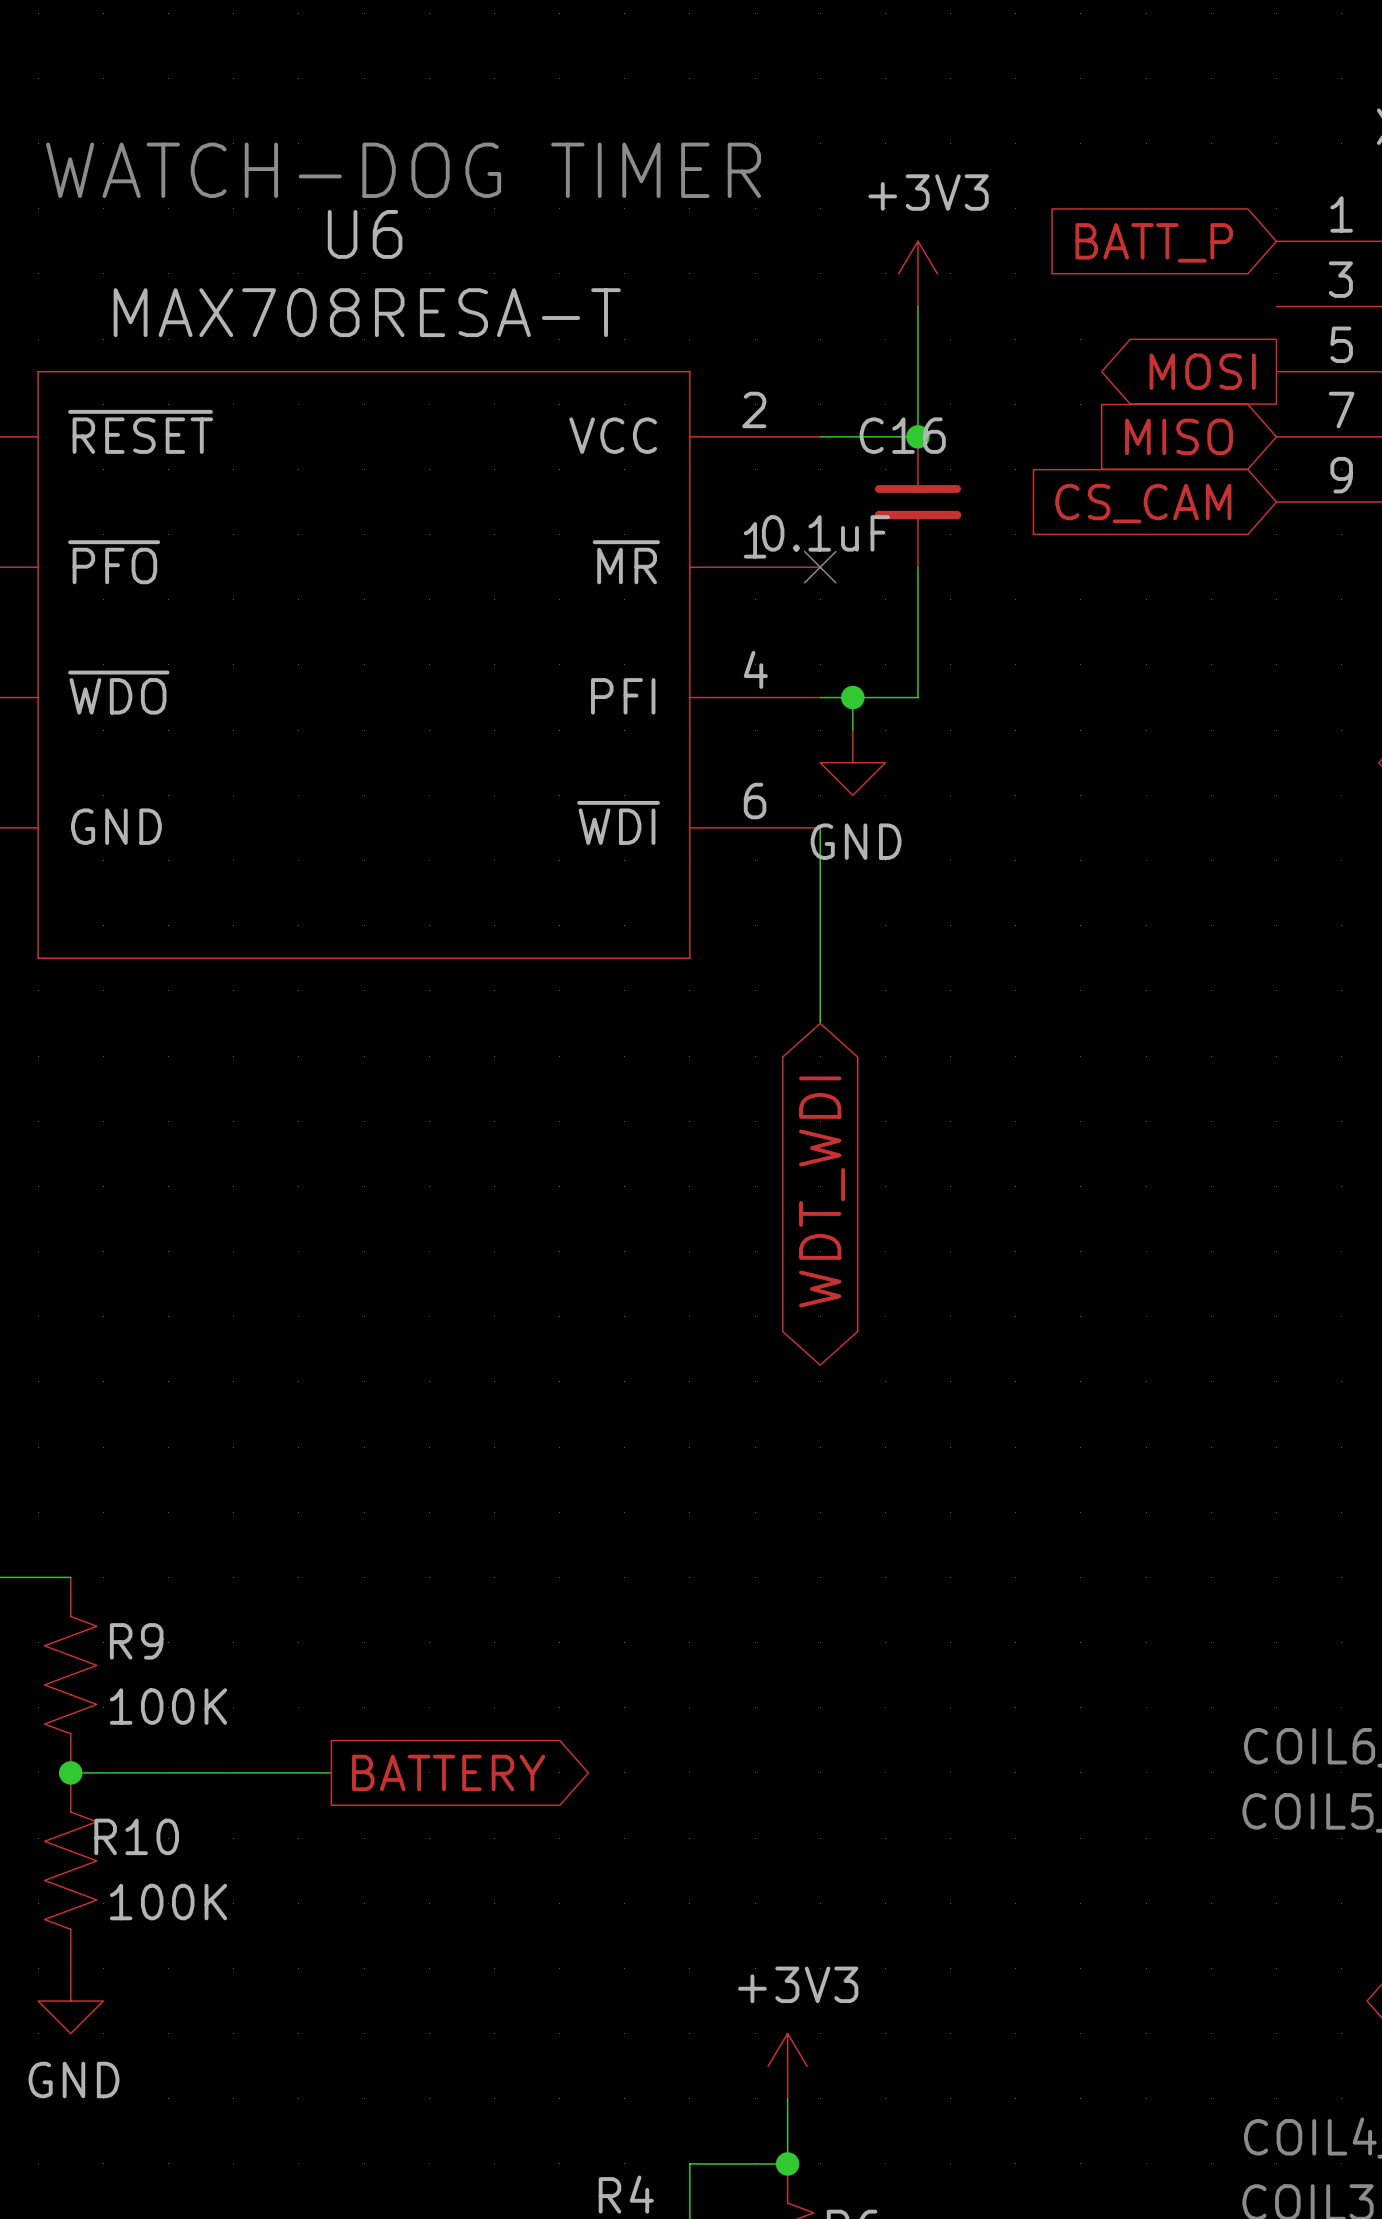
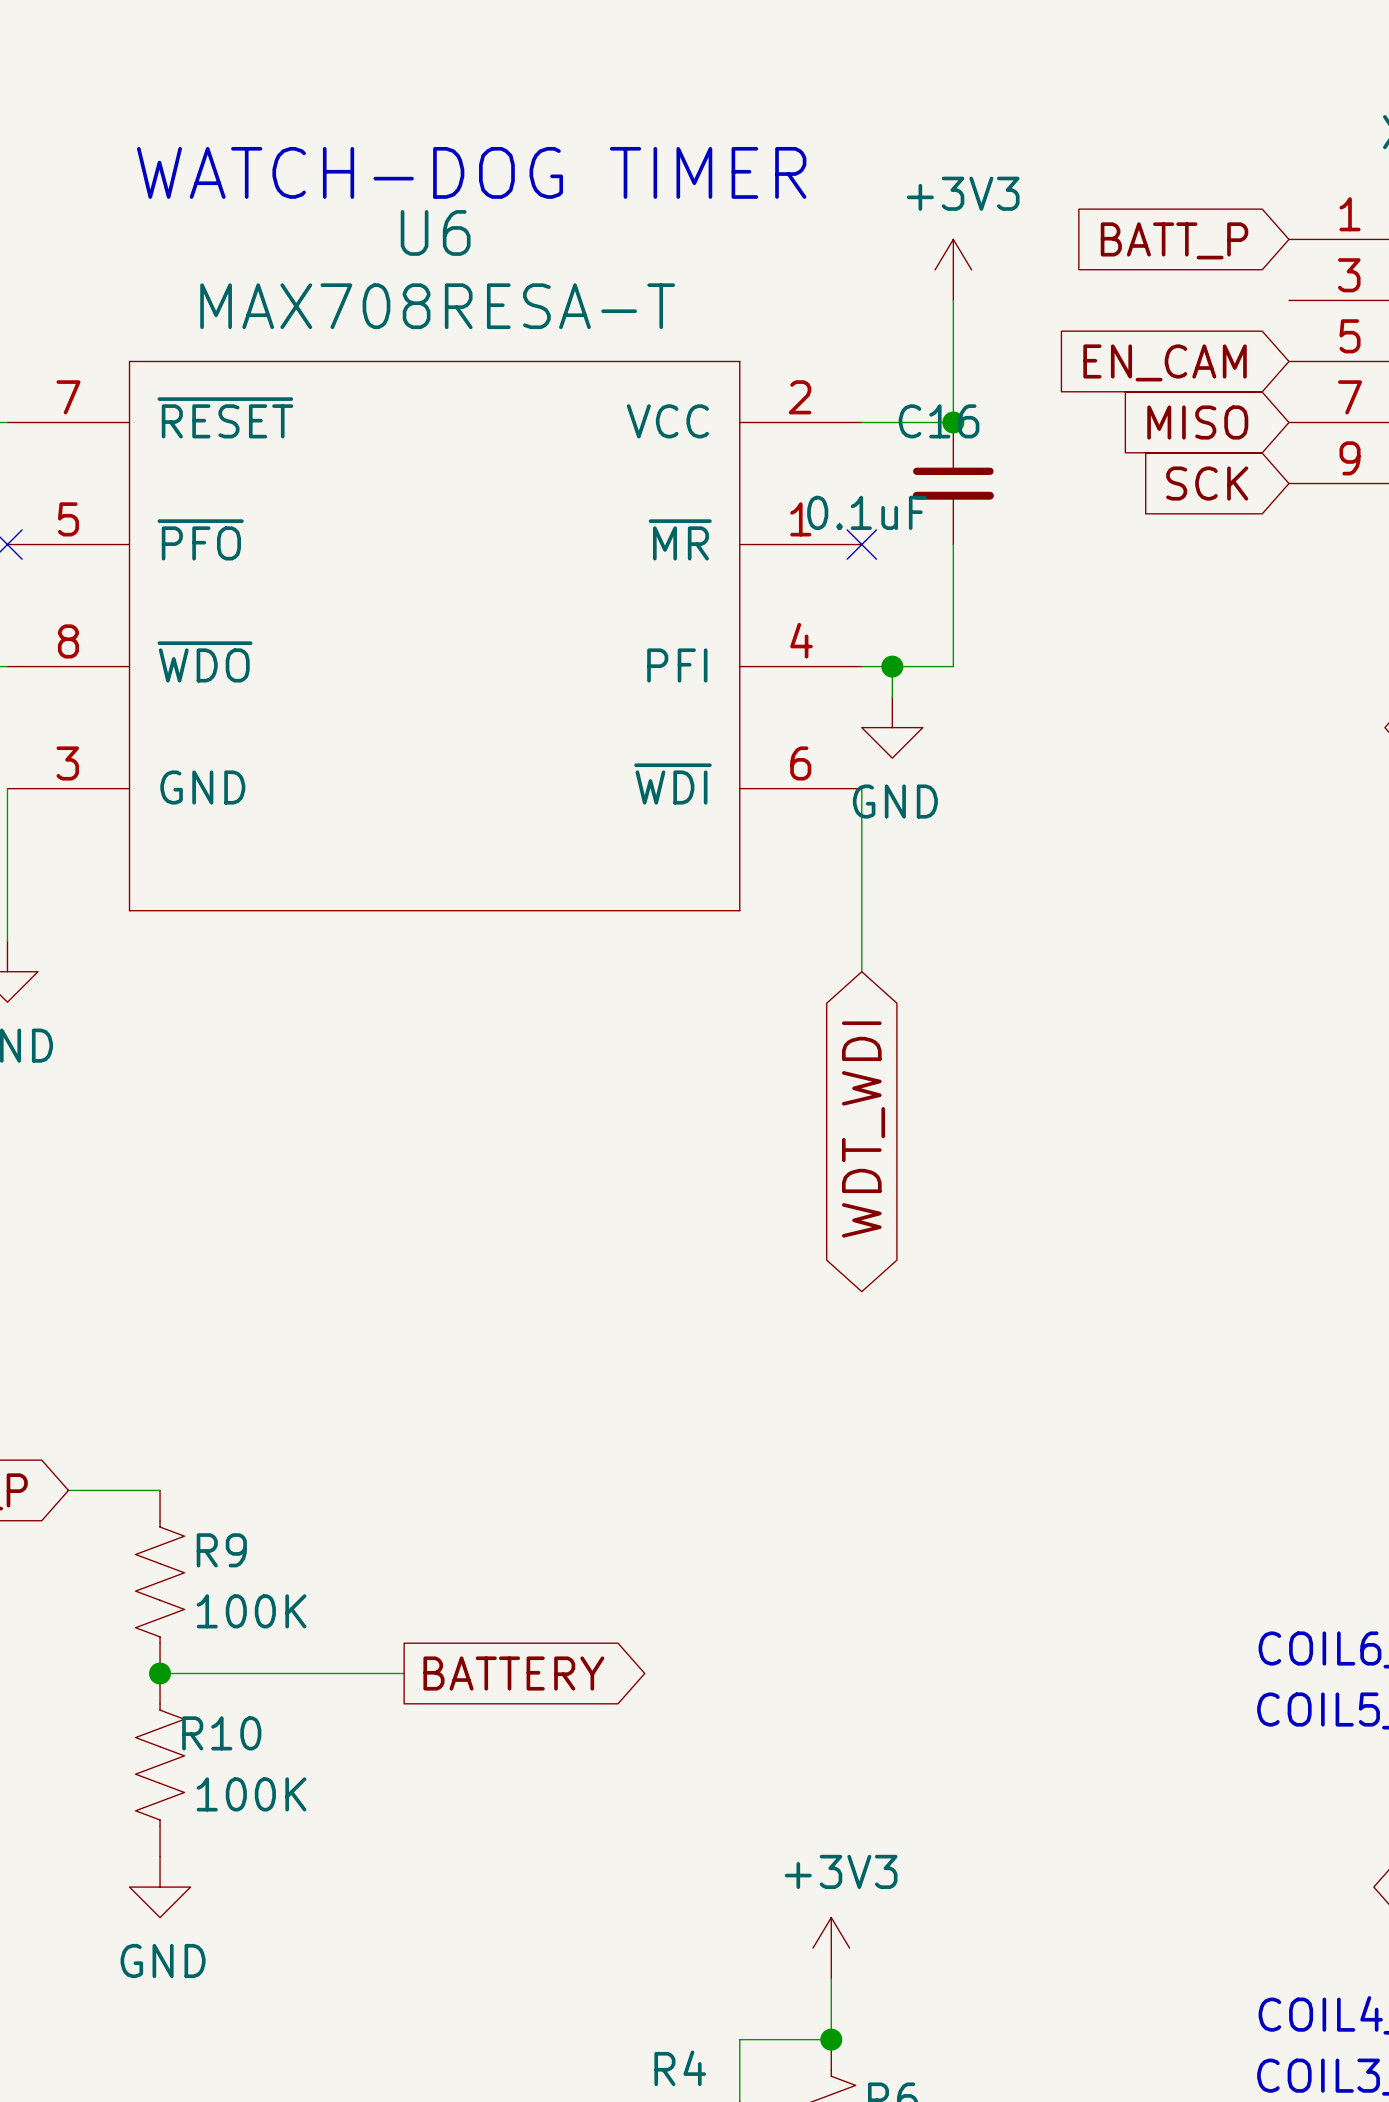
global label shape: output (1202, 371) -> input (1165, 362)
global label: MOSI (1202, 371) -> EN_CAM (1165, 362)
global label: CS_CAM (1143, 503) -> SCK (1207, 483)

